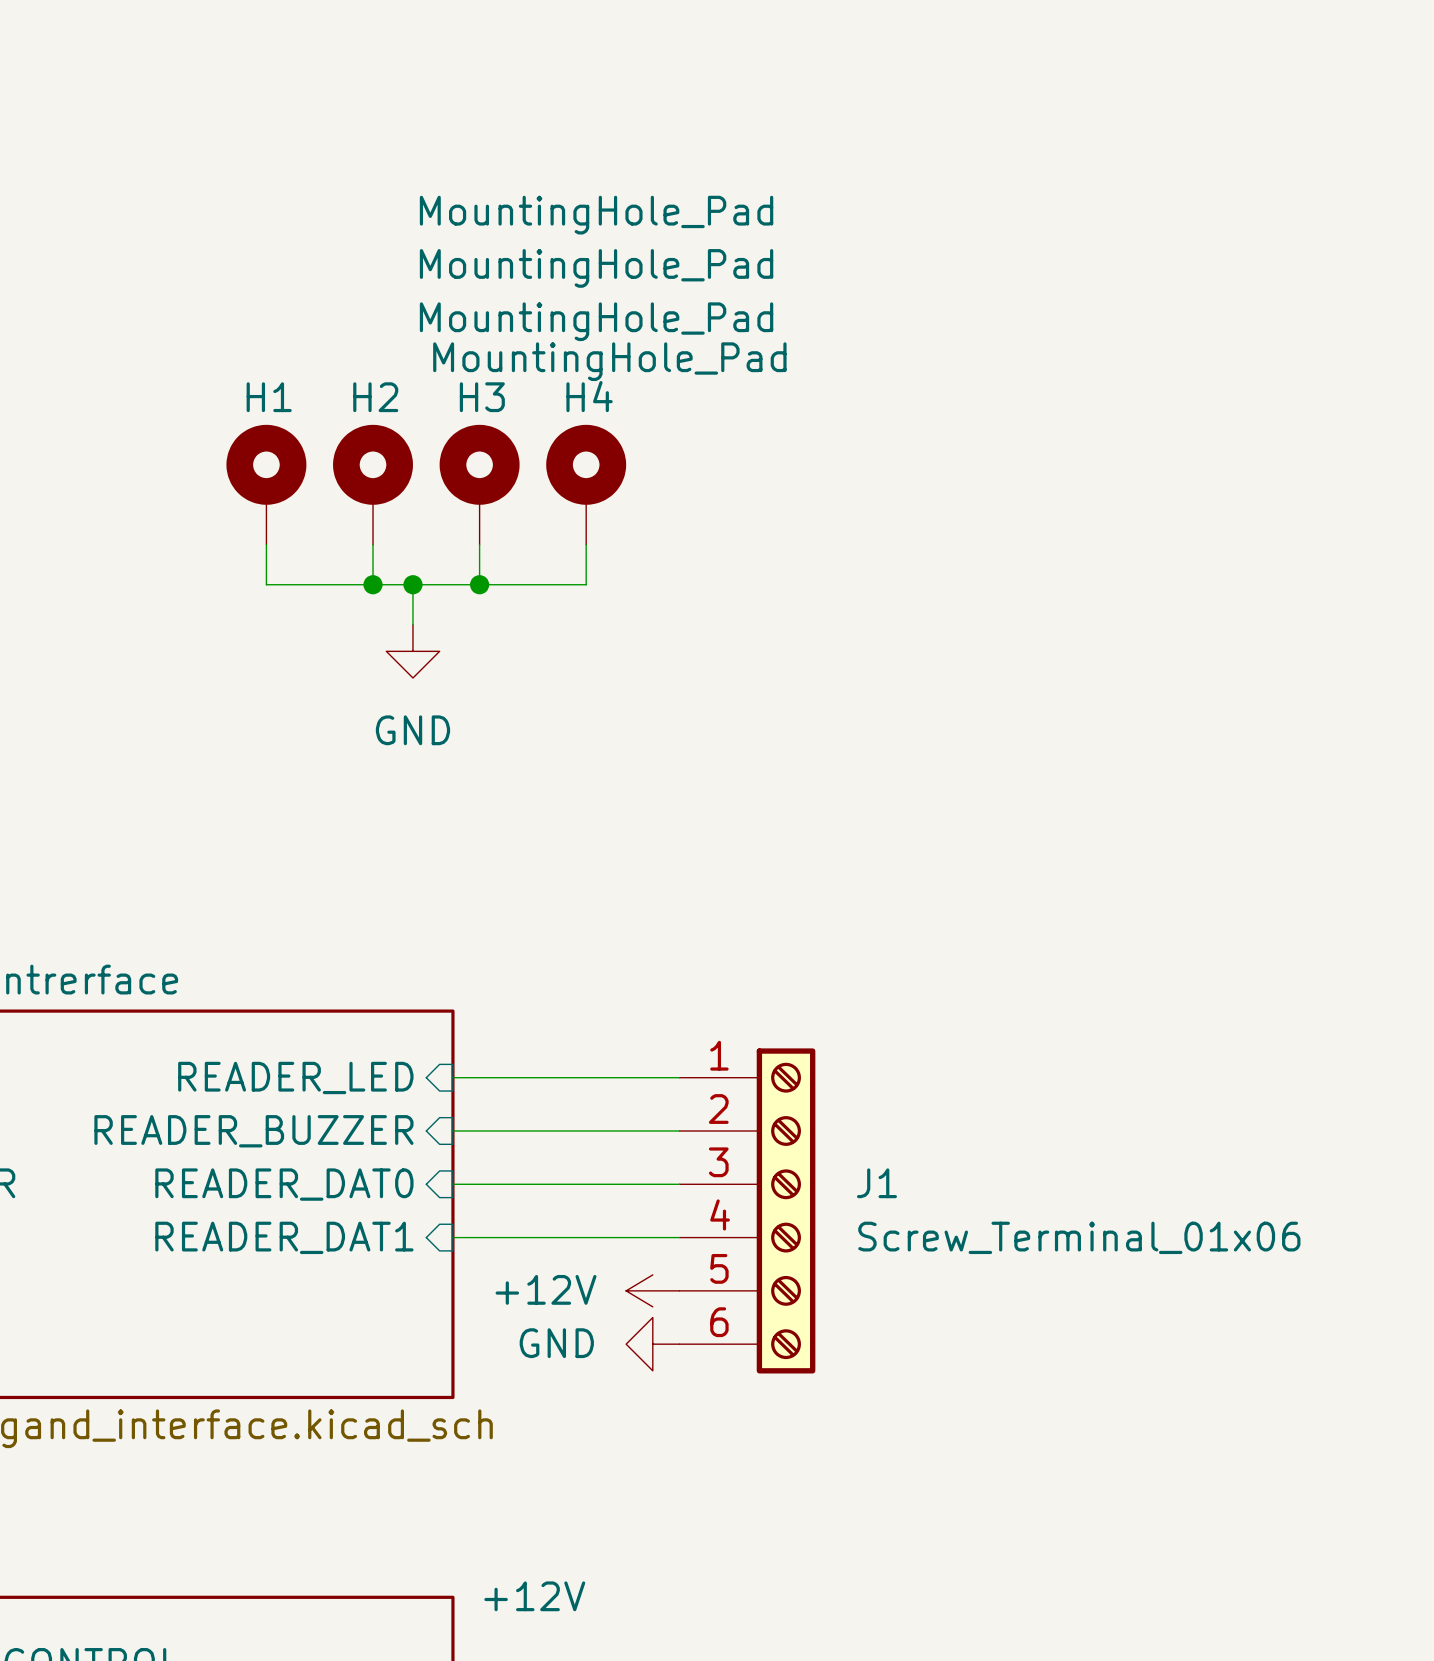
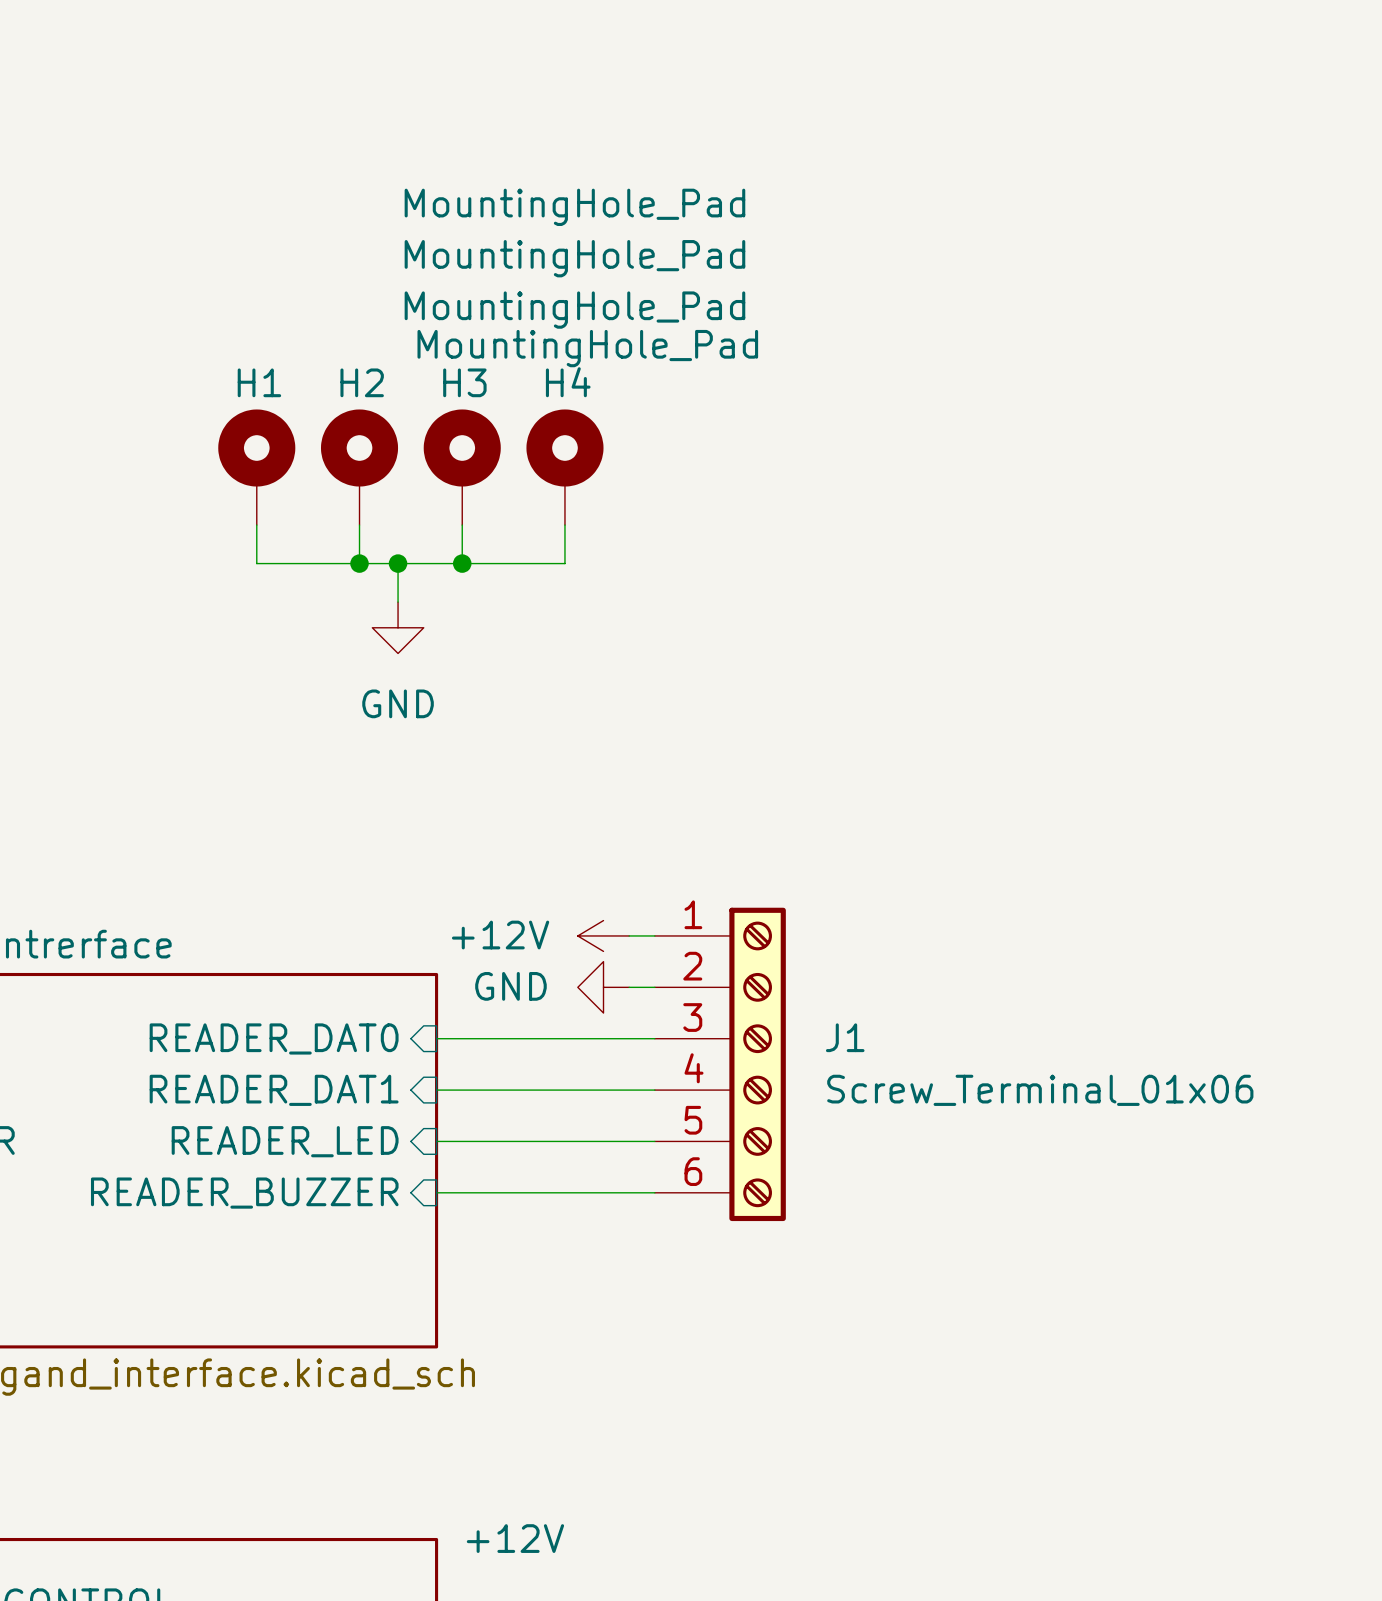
wire: none -> (629, 935) (654, 935)
wire: none -> (629, 987) (654, 987)
sheet pin: READER_LED (295, 1077) -> READER_DAT0 (274, 1038)
sheet pin: READER_BUZZER (253, 1131) -> READER_DAT1 (274, 1090)
sheet pin: READER_DAT0 (284, 1184) -> READER_LED (285, 1141)
J1 position: (747, 1210) -> (720, 1064)
sheet pin: READER_DAT1 (284, 1237) -> READER_BUZZER (244, 1193)
power symbol position: +12V (652, 1290) -> +12V (603, 935)
power symbol position: GND (652, 1344) -> GND (603, 987)

